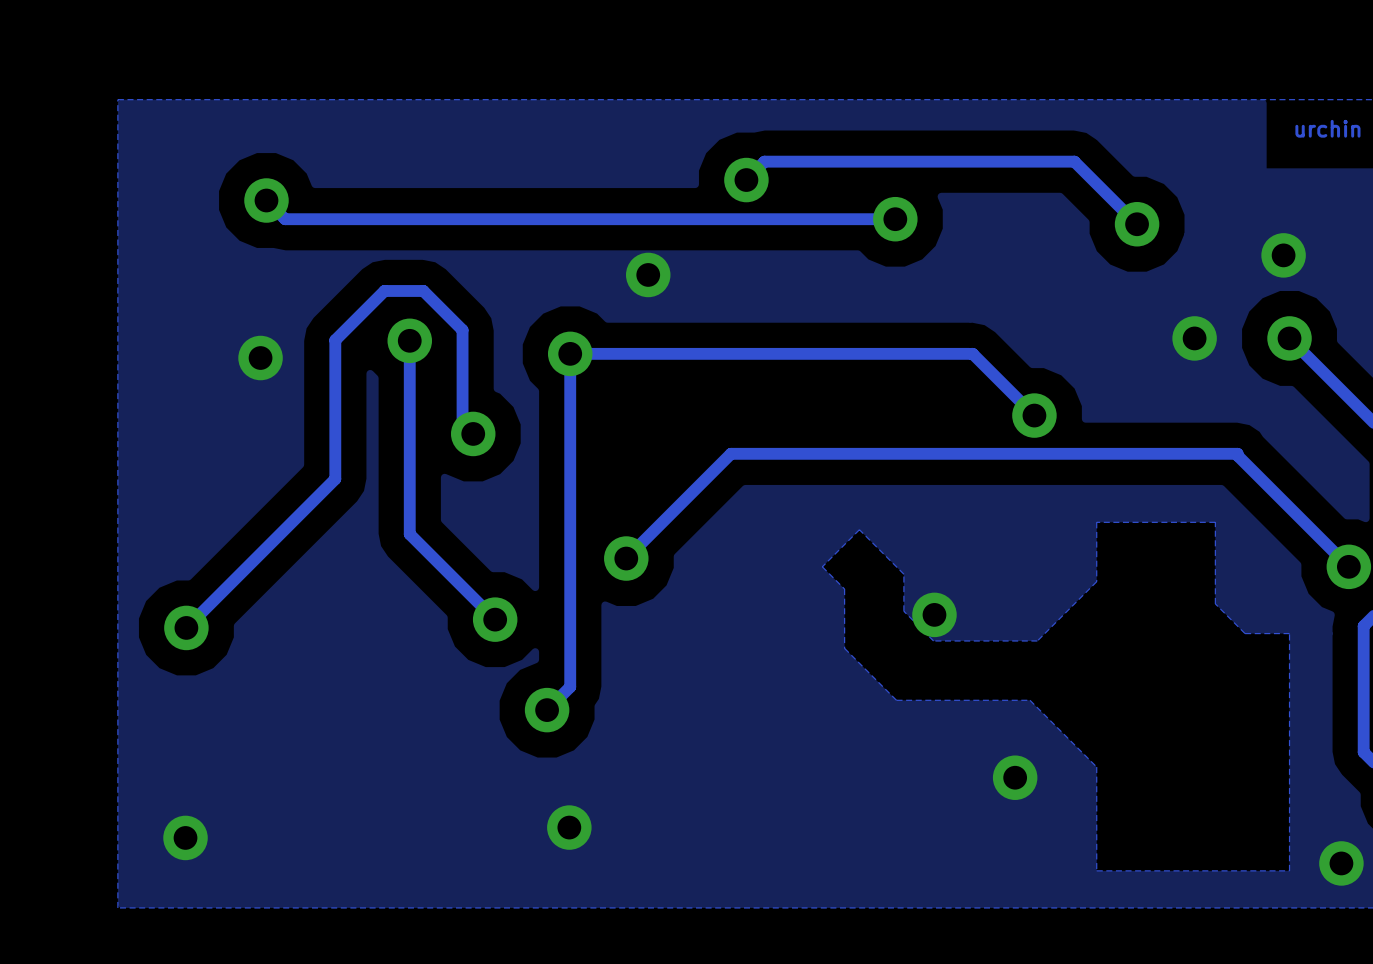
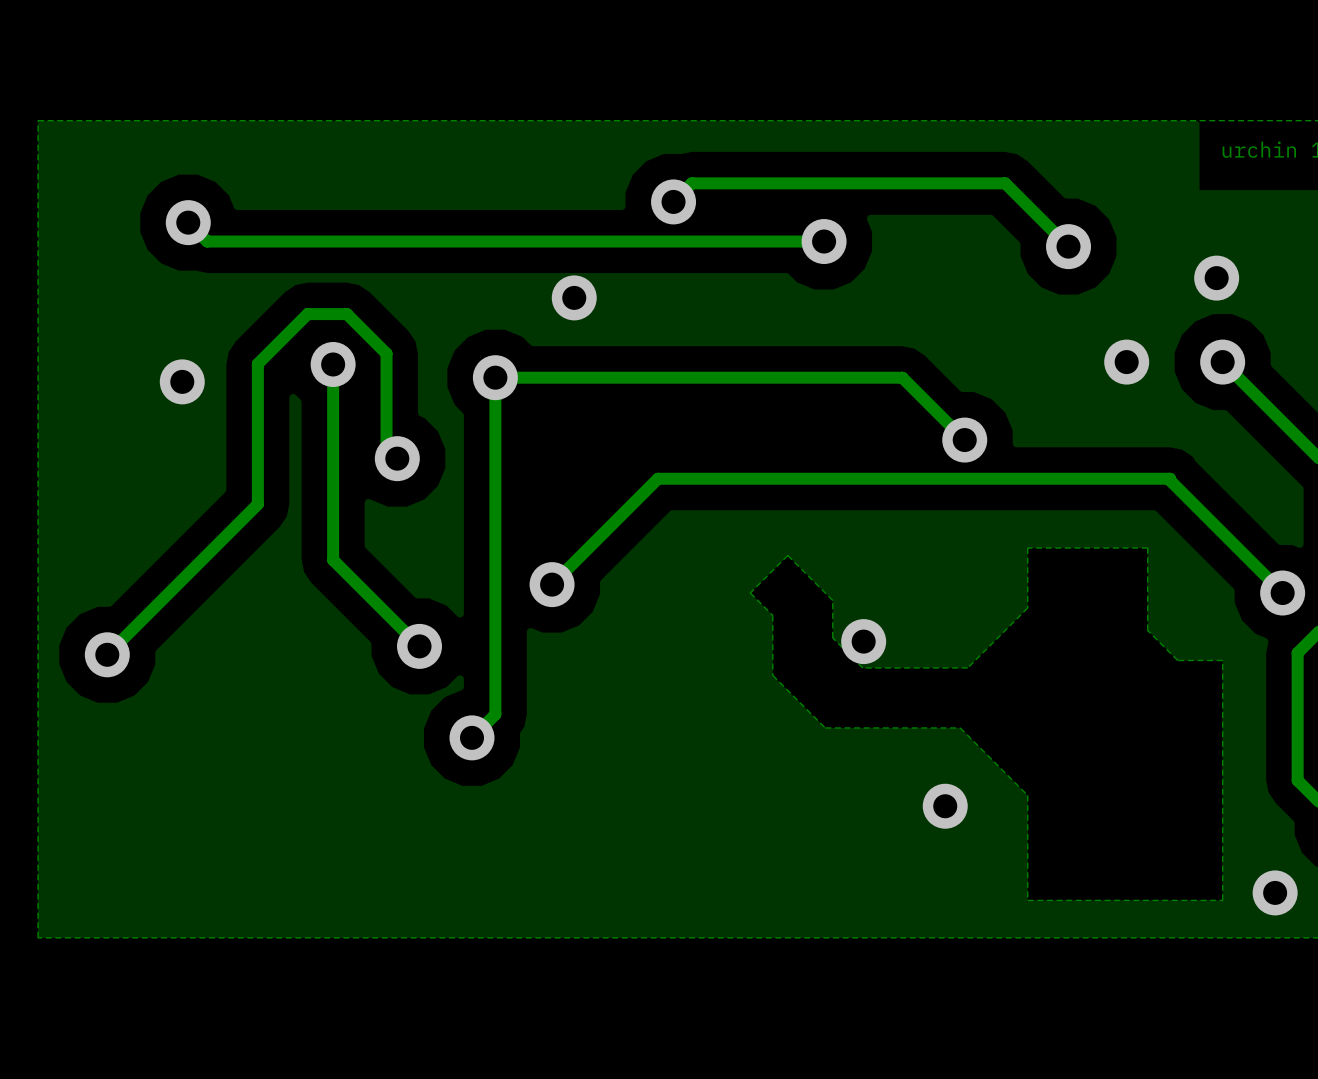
via: (569, 827) -> none
via: (185, 837) -> none

